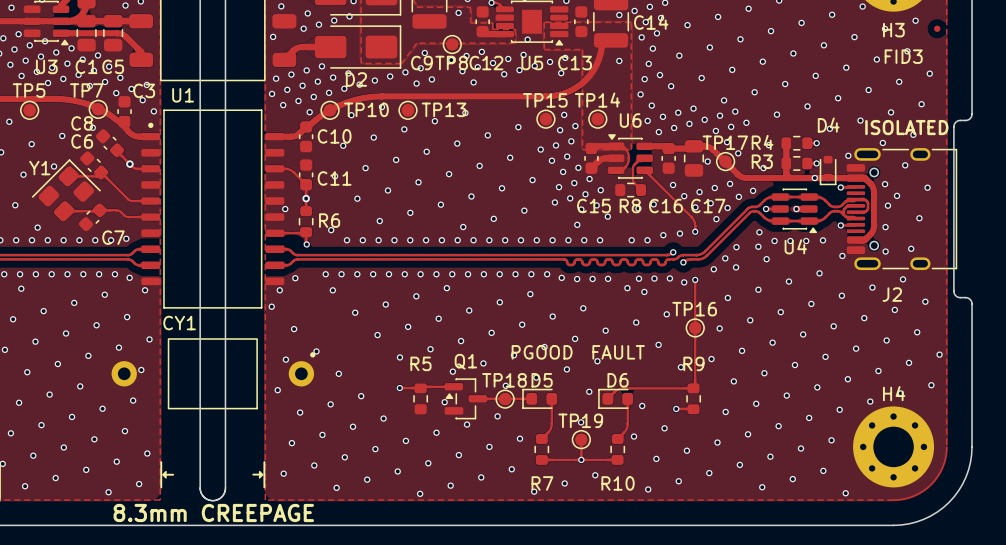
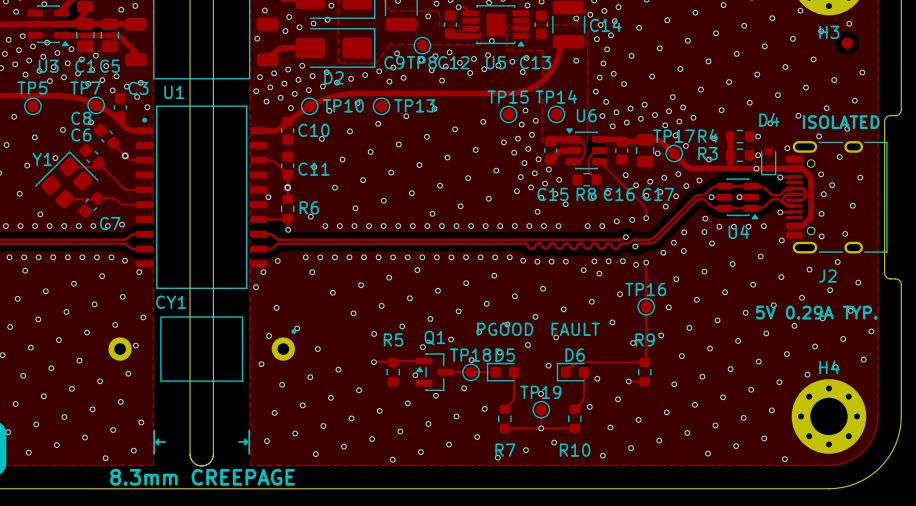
FID3: (937, 28) -> none
part: none -> (847, 43)
via: (907, 51) -> none
text: none -> 5V 0.29A TYP. (816, 312)

